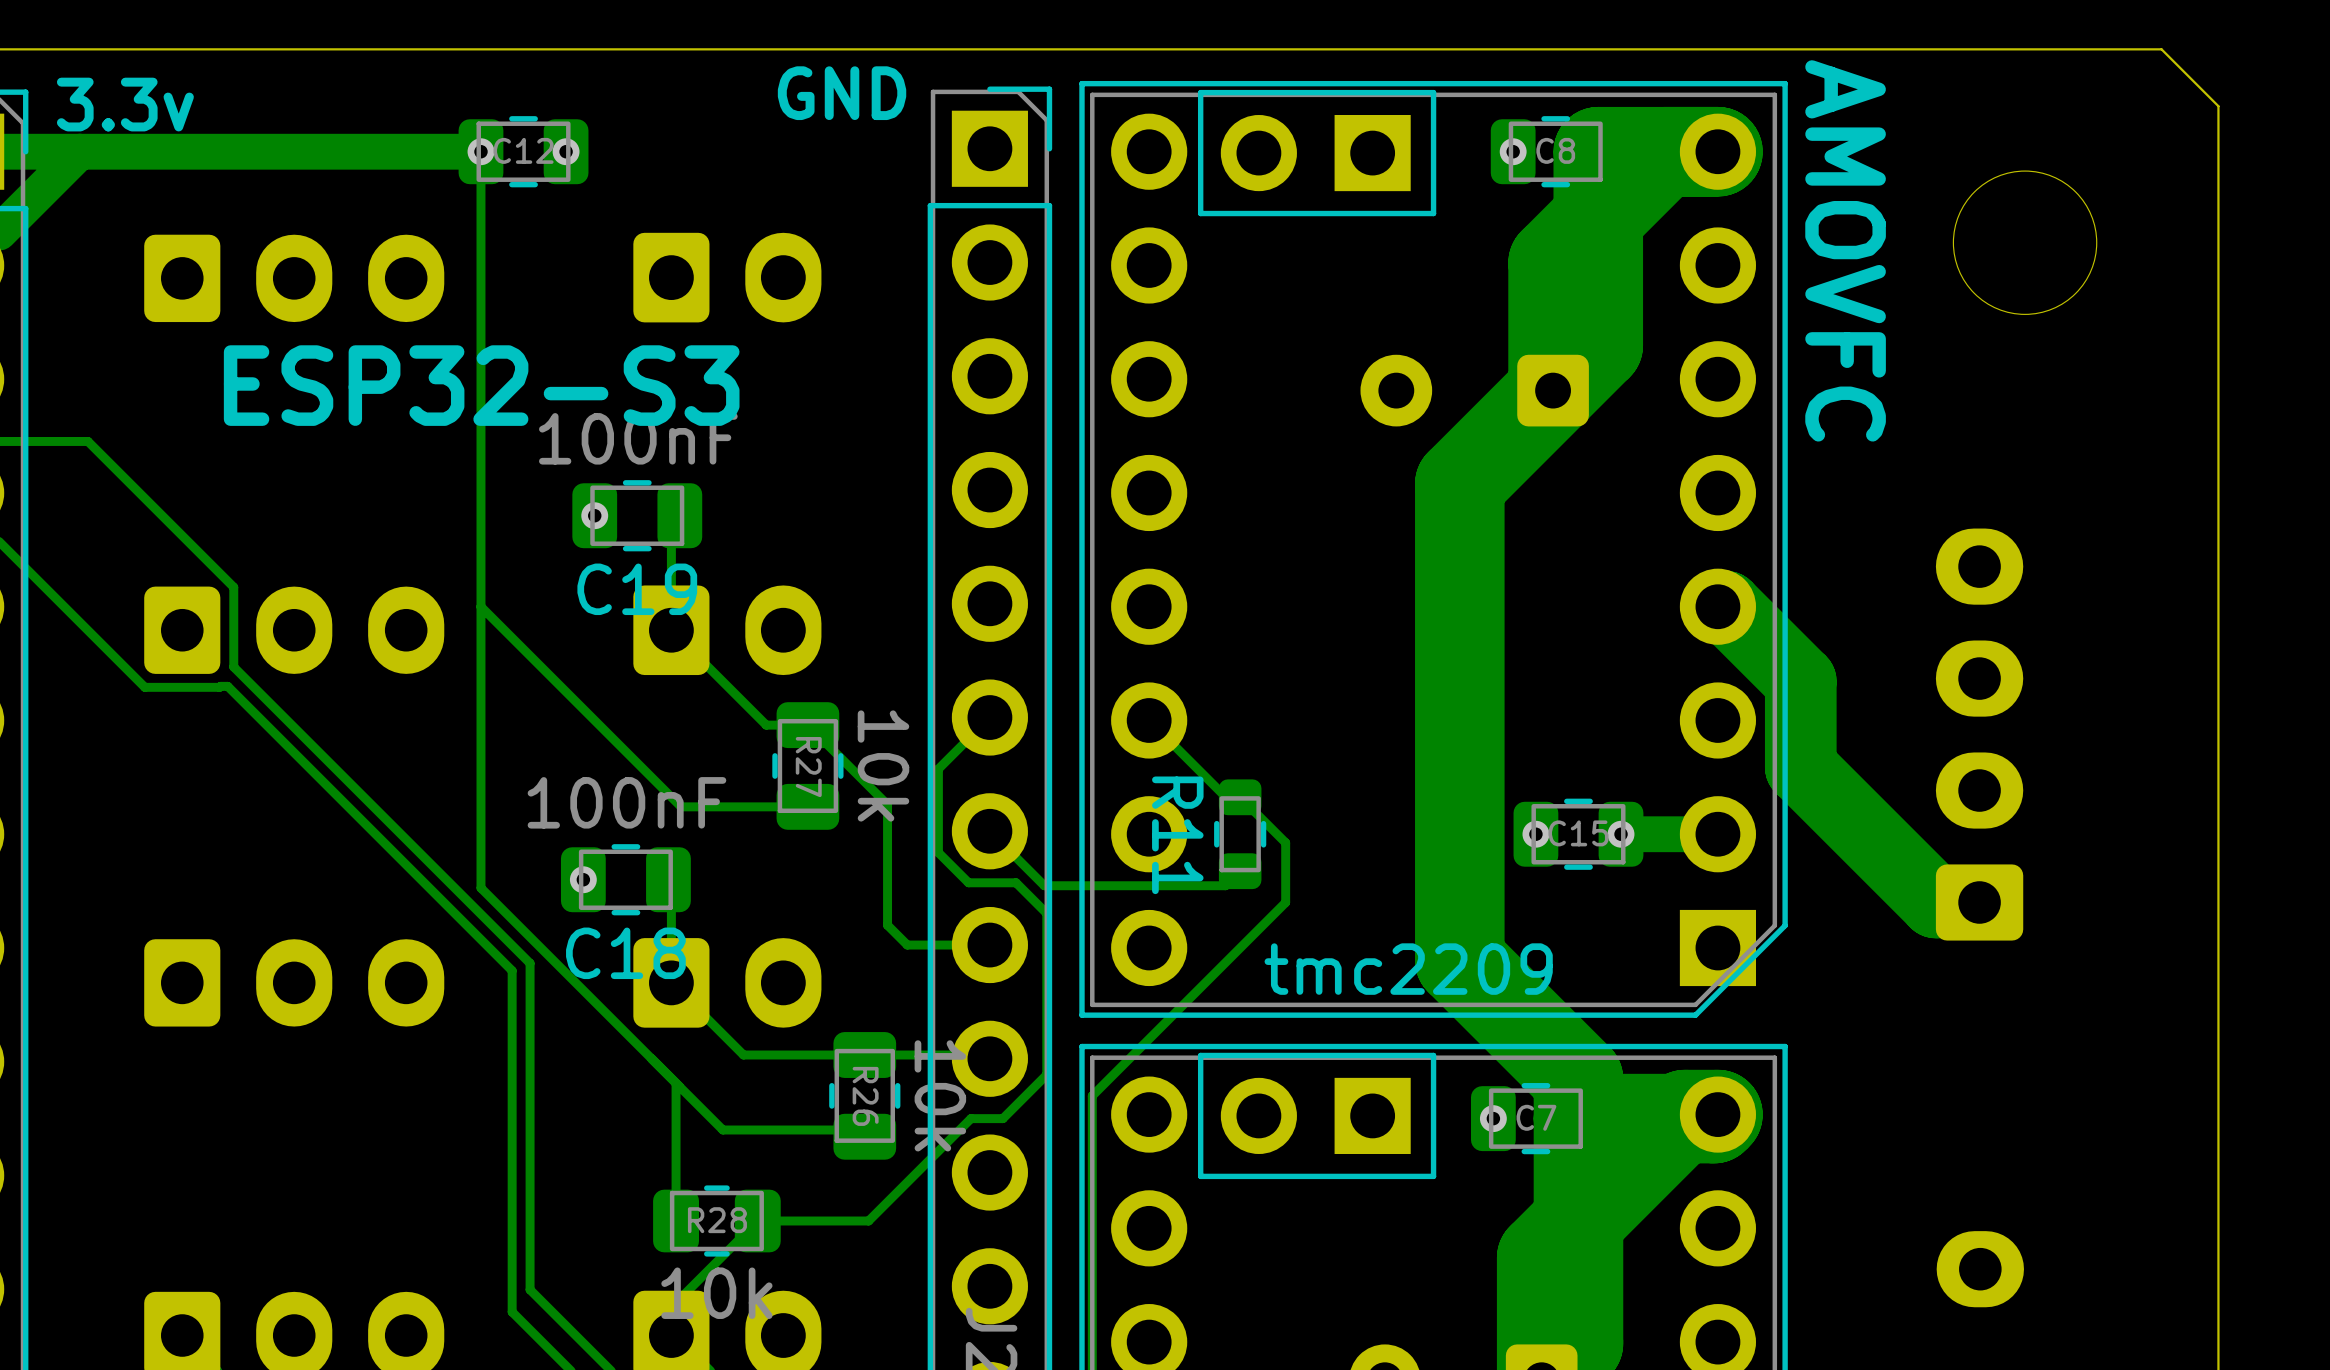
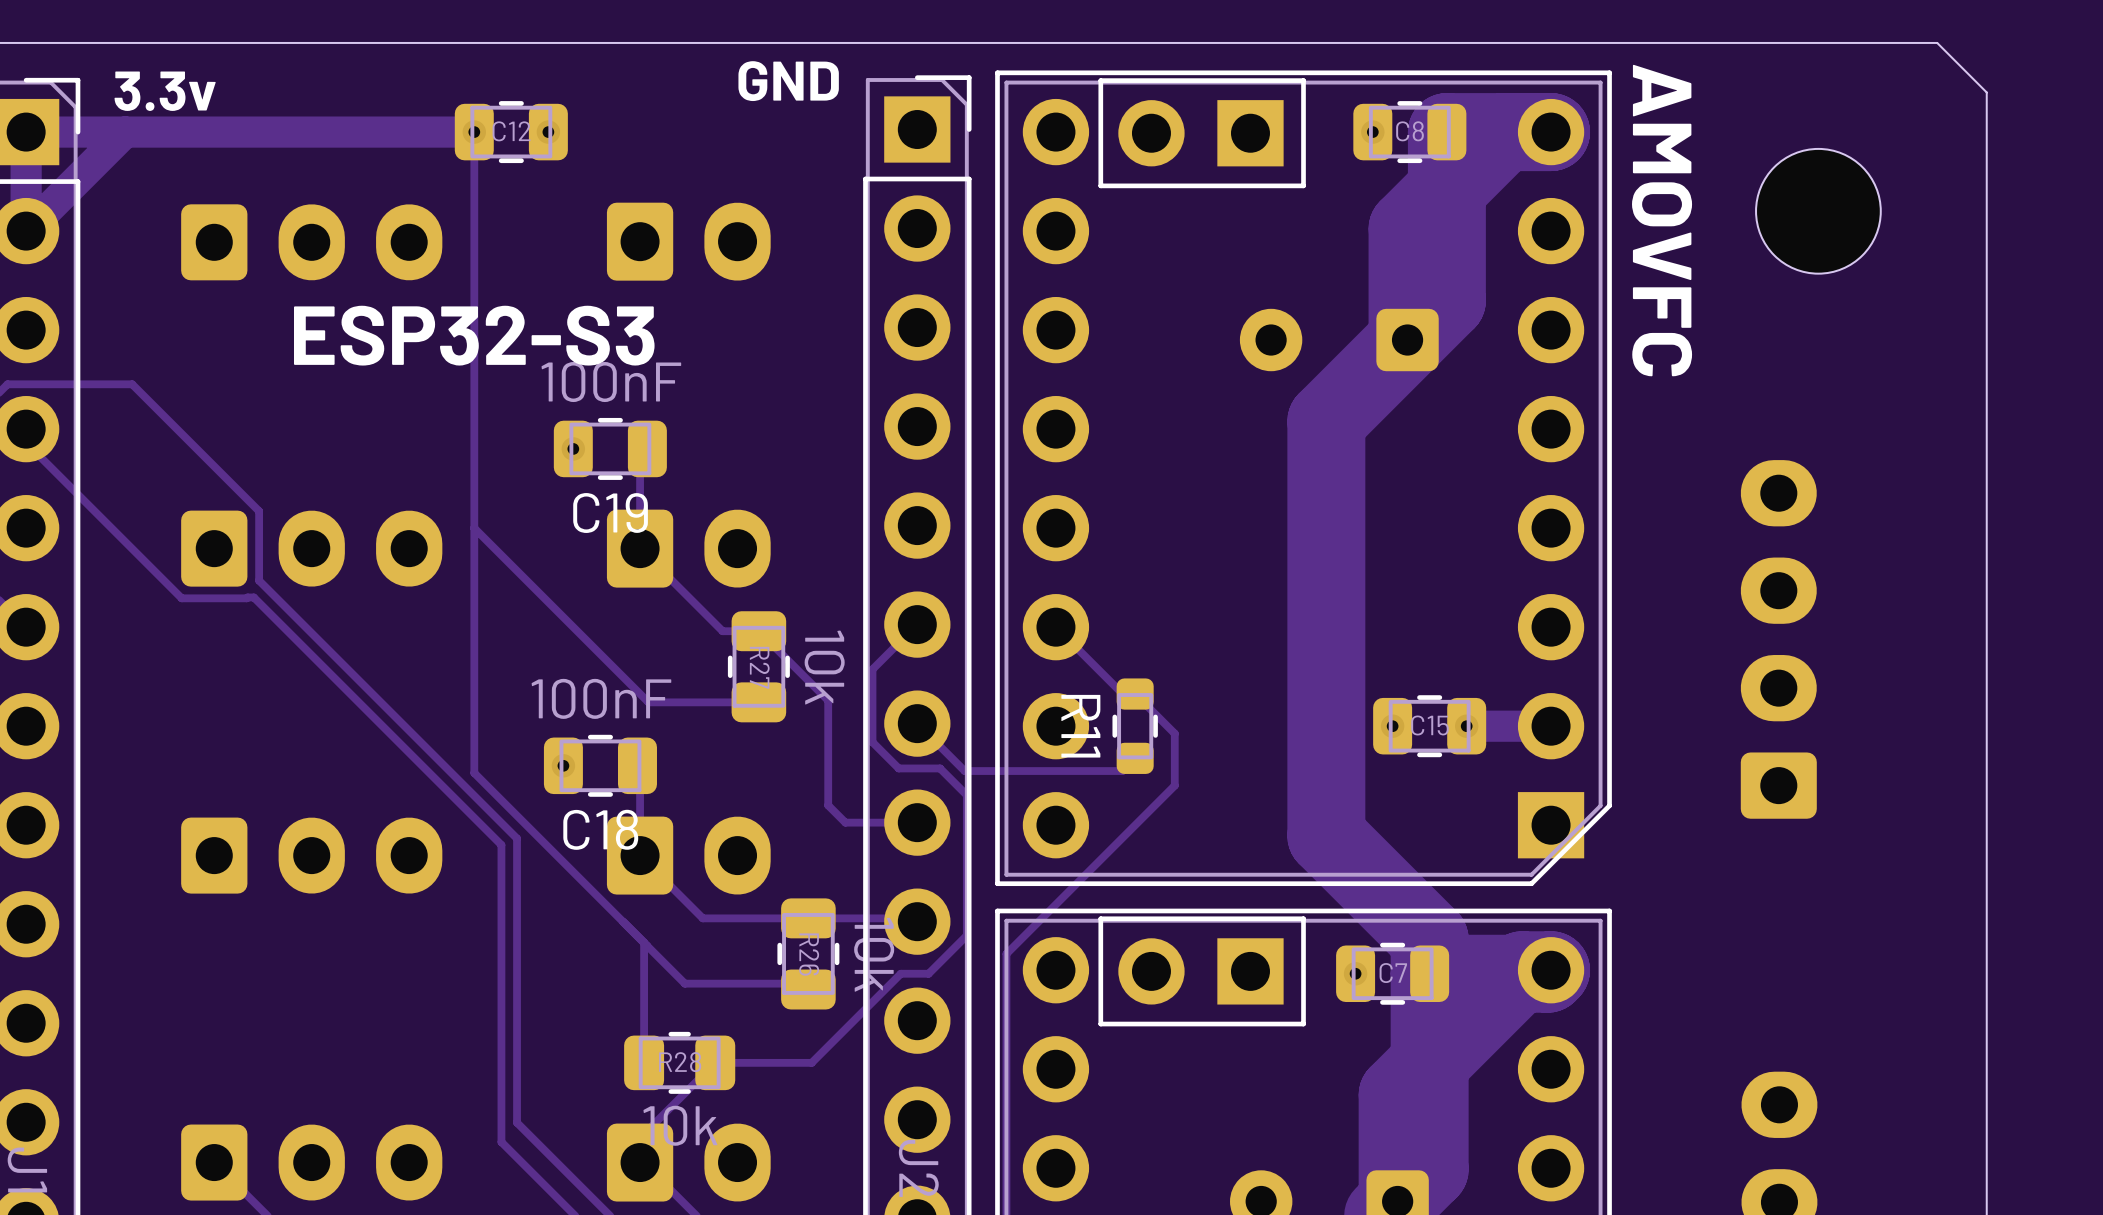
track: (1717, 606) (1726, 606) (1800, 681) (1800, 767) (1935, 902) (1979, 902) -> none
part value: tmc2209 (1408, 969) -> none

